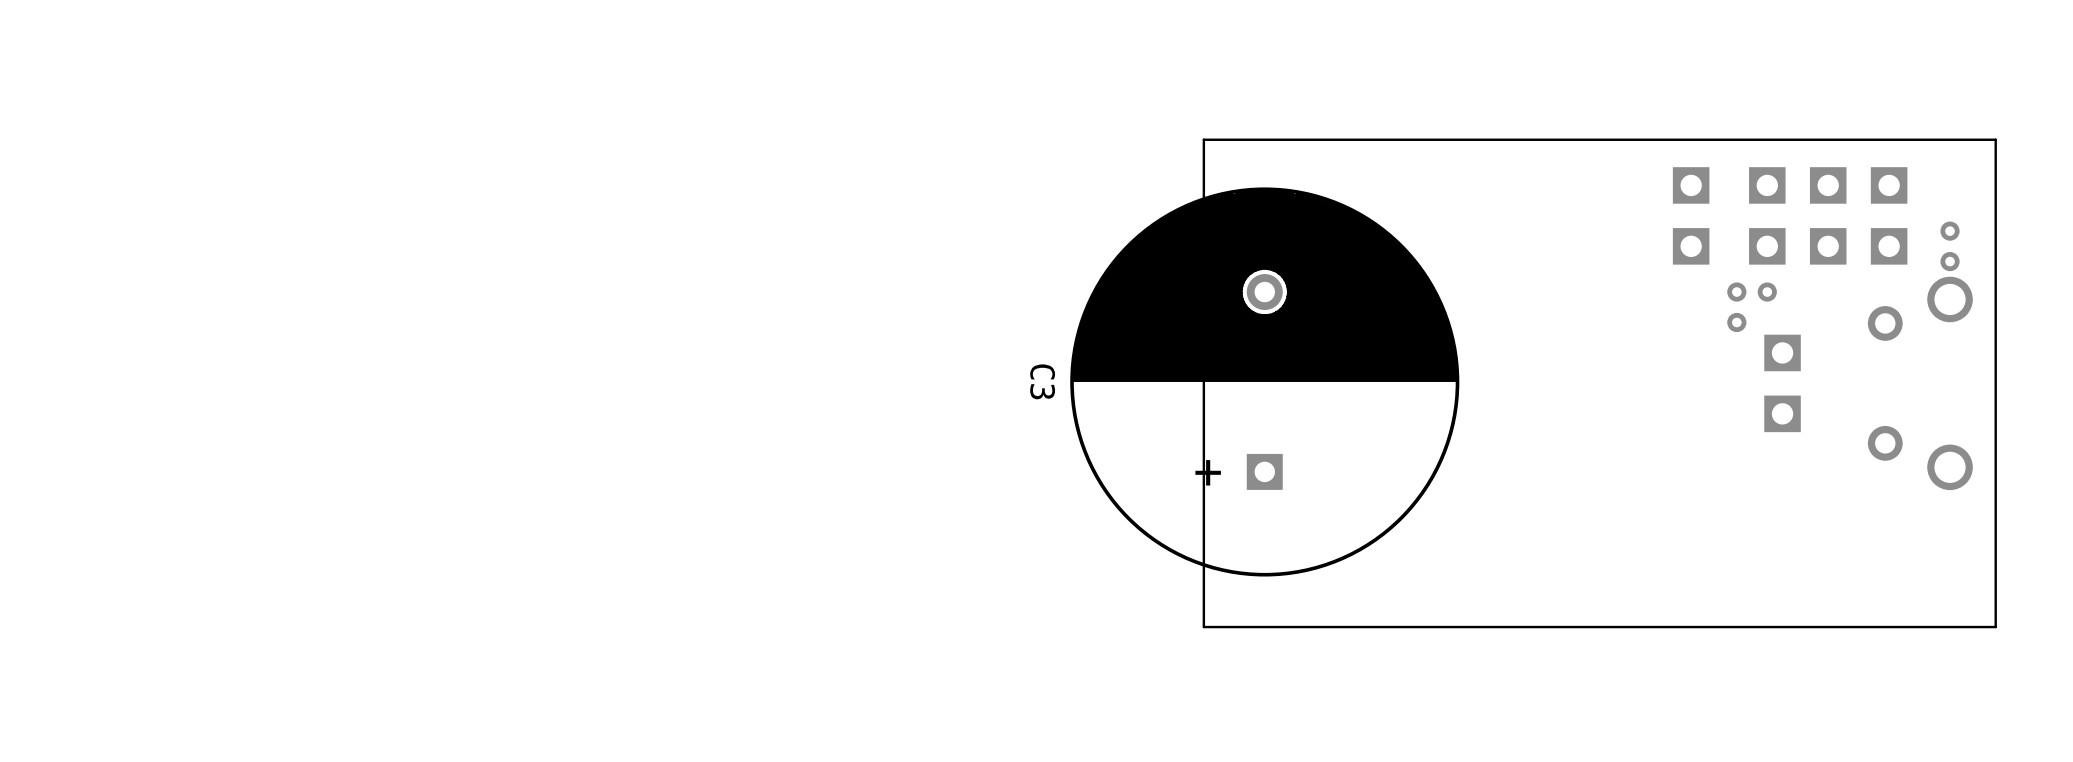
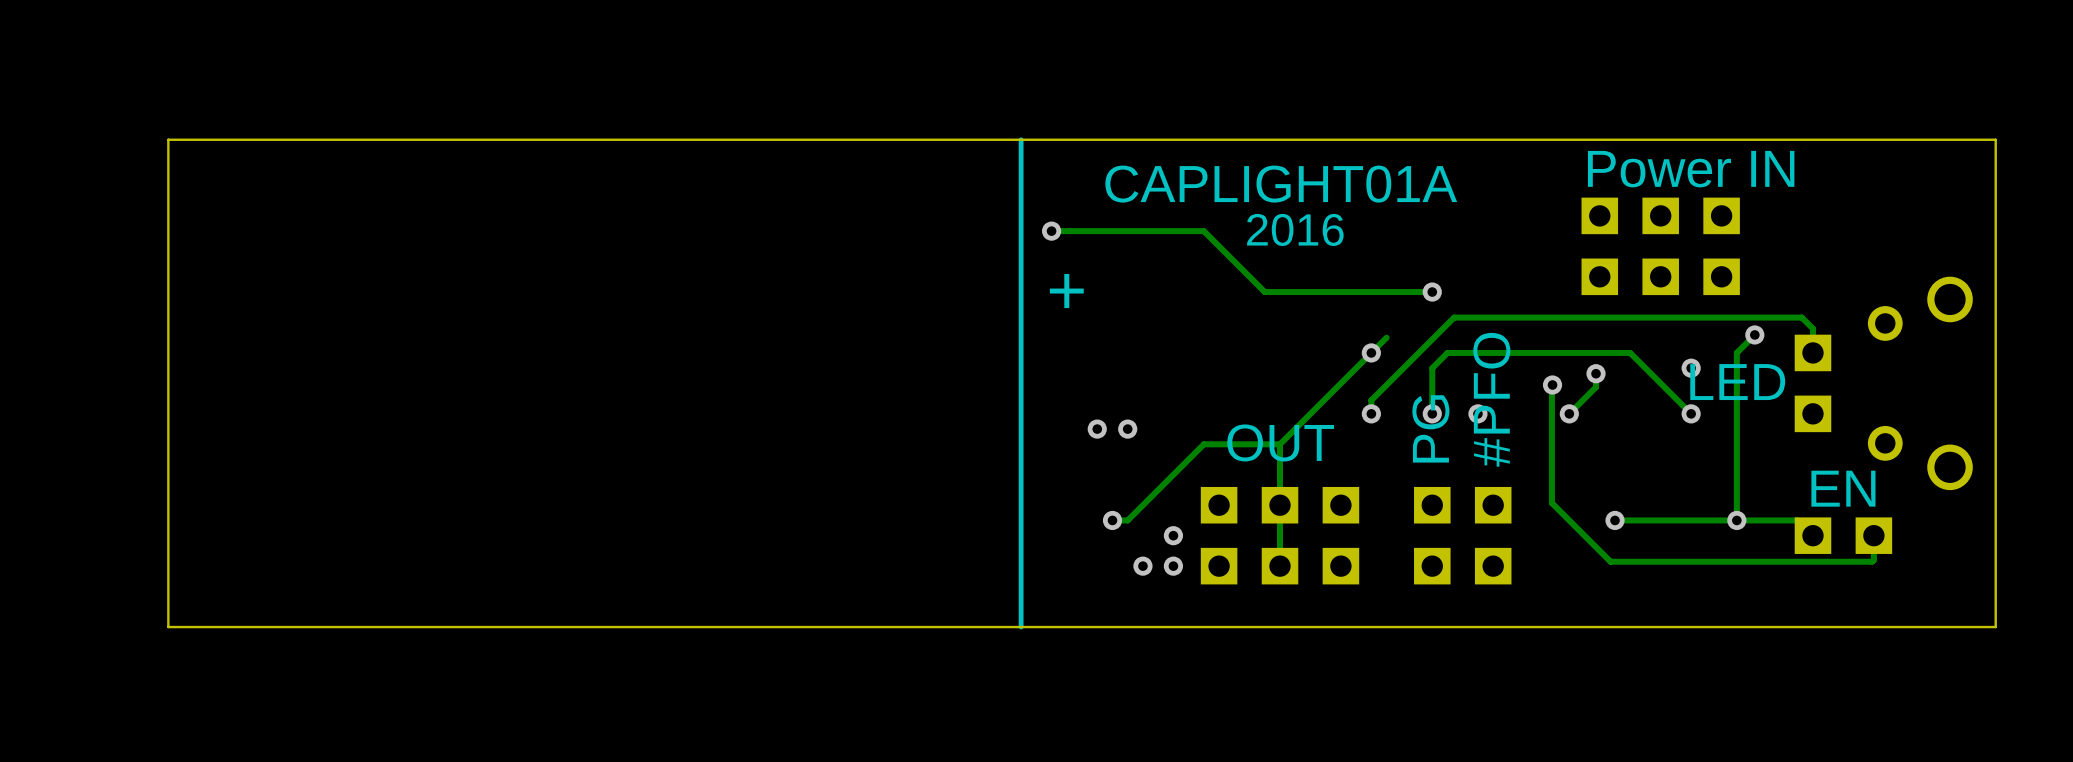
line: none -> (1021, 139) (1021, 627)
board edge: (1203, 139) (1203, 627) -> (1203, 139) (168, 139) (168, 627) (1203, 627)
text: none -> Power IN (1691, 169)
text: none -> CAPLIGHT01A (1281, 184)
part: (1691, 185) -> none
part position: (1828, 215) -> (1660, 246)
text: none -> 2016 (1295, 229)
track: none -> (1051, 231) (1203, 231) (1264, 292) (1432, 292)
via: none -> (1051, 231)
via: (1950, 231) -> none
part: (1691, 246) -> none
via: (1950, 261) -> none
via: none -> (1432, 292)
via: (1736, 292) -> none
via: (1767, 292) -> none
text: none -> + (1066, 291)
via position: (1736, 322) -> (1754, 334)
track: none -> (1754, 334) (1736, 352) (1736, 520)
track: none -> (1386, 337) (1280, 444)
via: none -> (1371, 352)
track: none -> (1812, 352) (1812, 328) (1801, 317) (1454, 317) (1371, 400) (1371, 413)
via: none -> (1691, 368)
track: none -> (1596, 373) (1596, 387) (1569, 413)
via: none -> (1596, 373)
C3: (1264, 381) -> none
text: none -> LED (1737, 382)
part position: (1782, 383) -> (1812, 383)
track: none -> (1552, 384) (1551, 503) (1610, 561) (1872, 561) (1873, 559) (1873, 535)
via: none -> (1552, 384)
text: none -> #PFO (1491, 399)
via: none -> (1371, 413)
via: none -> (1432, 413)
via: none -> (1477, 413)
via: none -> (1569, 413)
track: none -> (1691, 413) (1630, 352) (1447, 352) (1432, 368) (1432, 413)
via: none -> (1691, 413)
text: none -> PG (1430, 428)
via: none -> (1097, 429)
via: none -> (1127, 429)
text: none -> OUT (1280, 442)
track: none -> (1280, 444) (1280, 566)
track: none -> (1280, 444) (1203, 444) (1127, 520) (1112, 520)
text: none -> EN (1843, 488)
via: none -> (1112, 520)
track: none -> (1615, 520) (1797, 520) (1812, 535)
via: none -> (1615, 520)
via: none -> (1736, 520)
via: none -> (1173, 535)
part: none -> (1280, 535)
part: none -> (1432, 535)
part: none -> (1493, 535)
part: none -> (1812, 535)
part: none -> (1873, 535)
via: none -> (1142, 566)
via: none -> (1173, 566)

